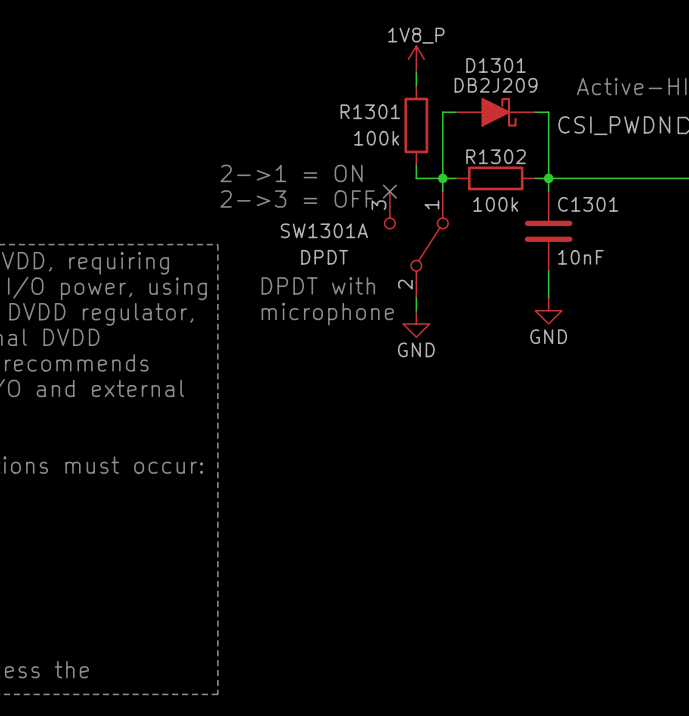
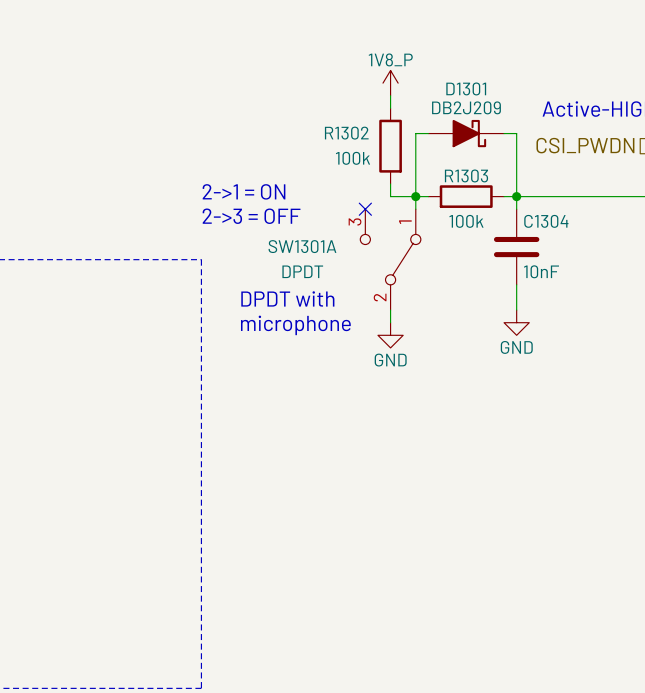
R1301 name: R1301 (370, 111) -> R1302 (346, 133)
R1302 name: R1302 (496, 156) -> R1303 (466, 175)
C1301 name: C1301 (588, 204) -> C1304 (546, 221)

